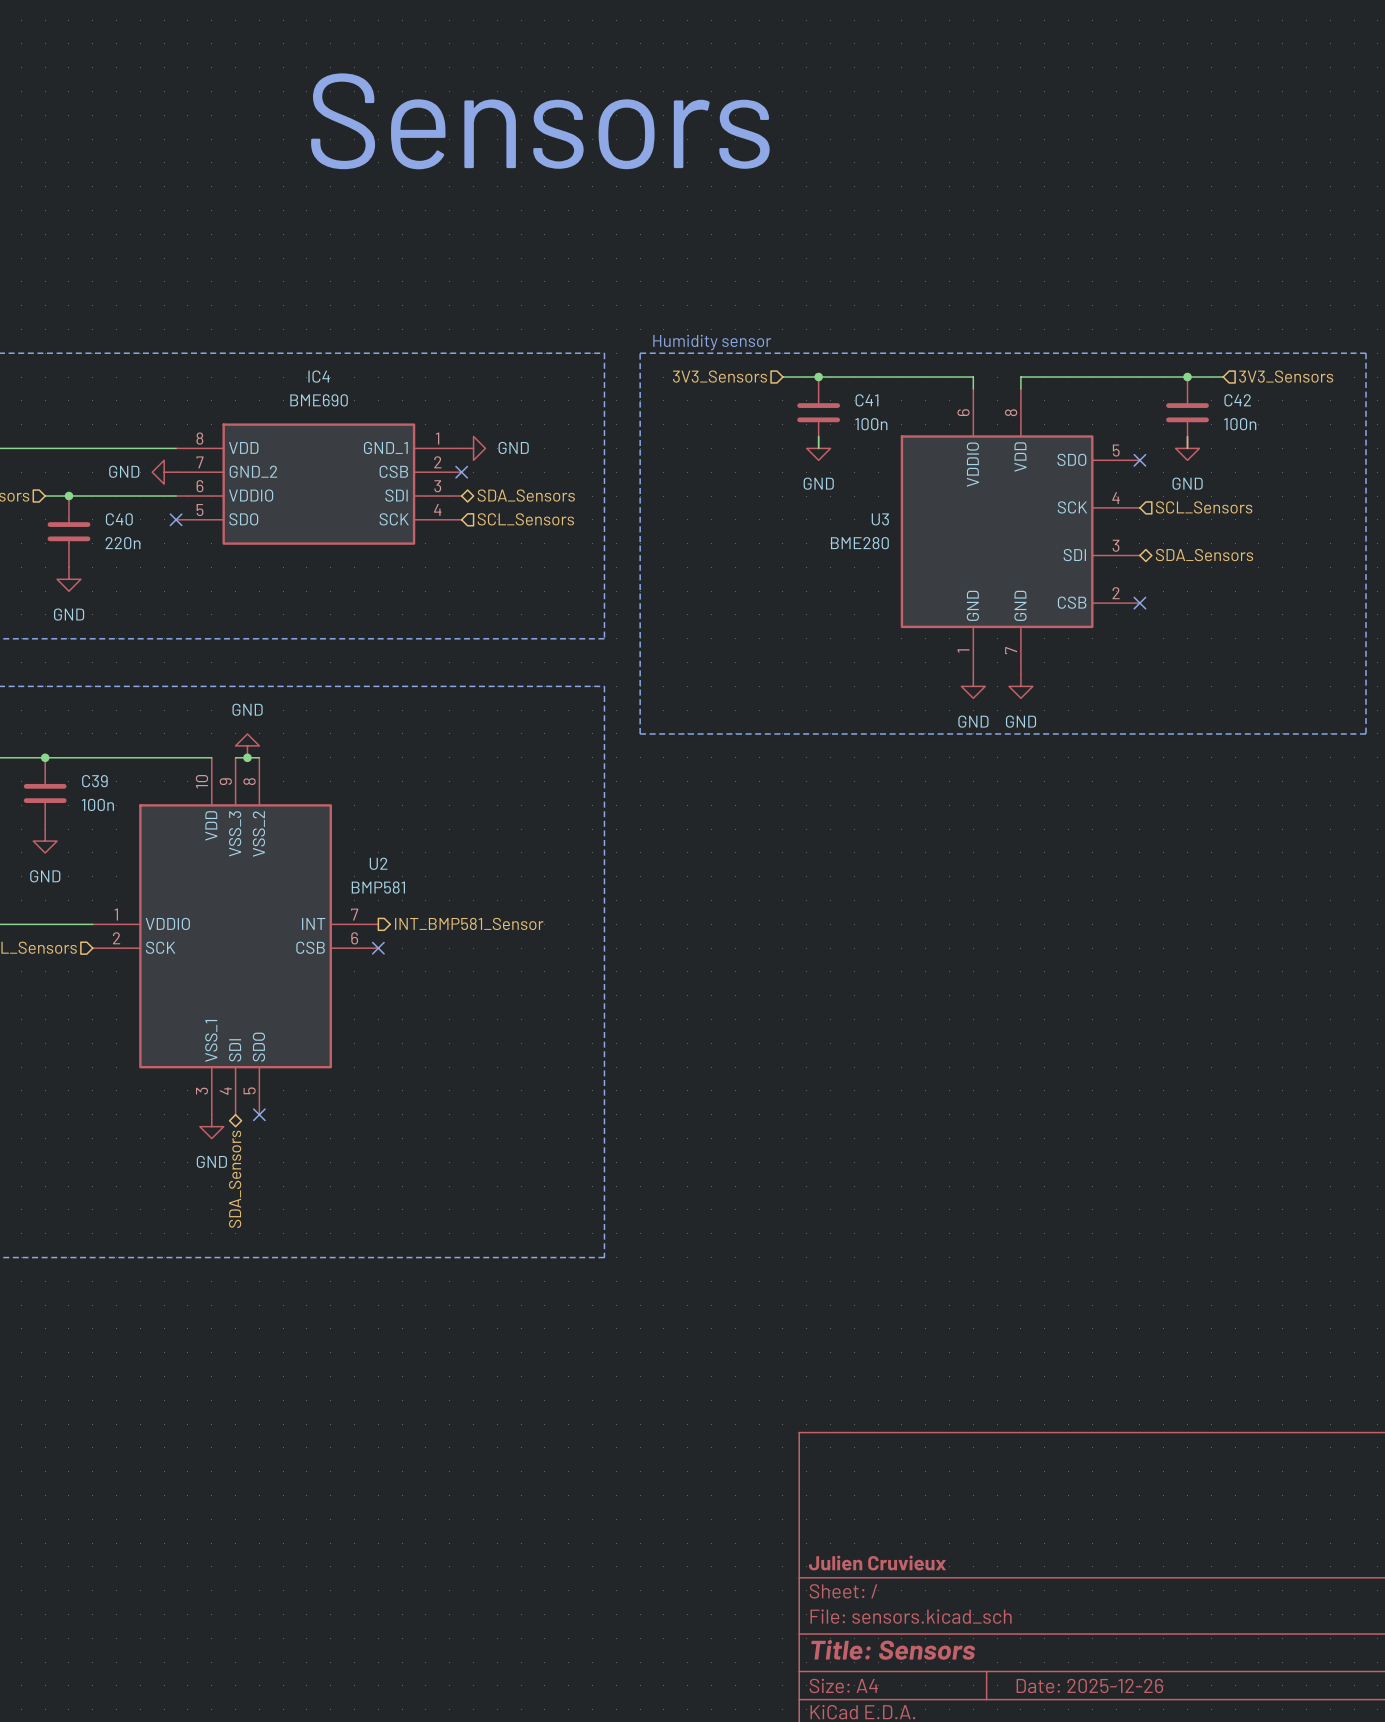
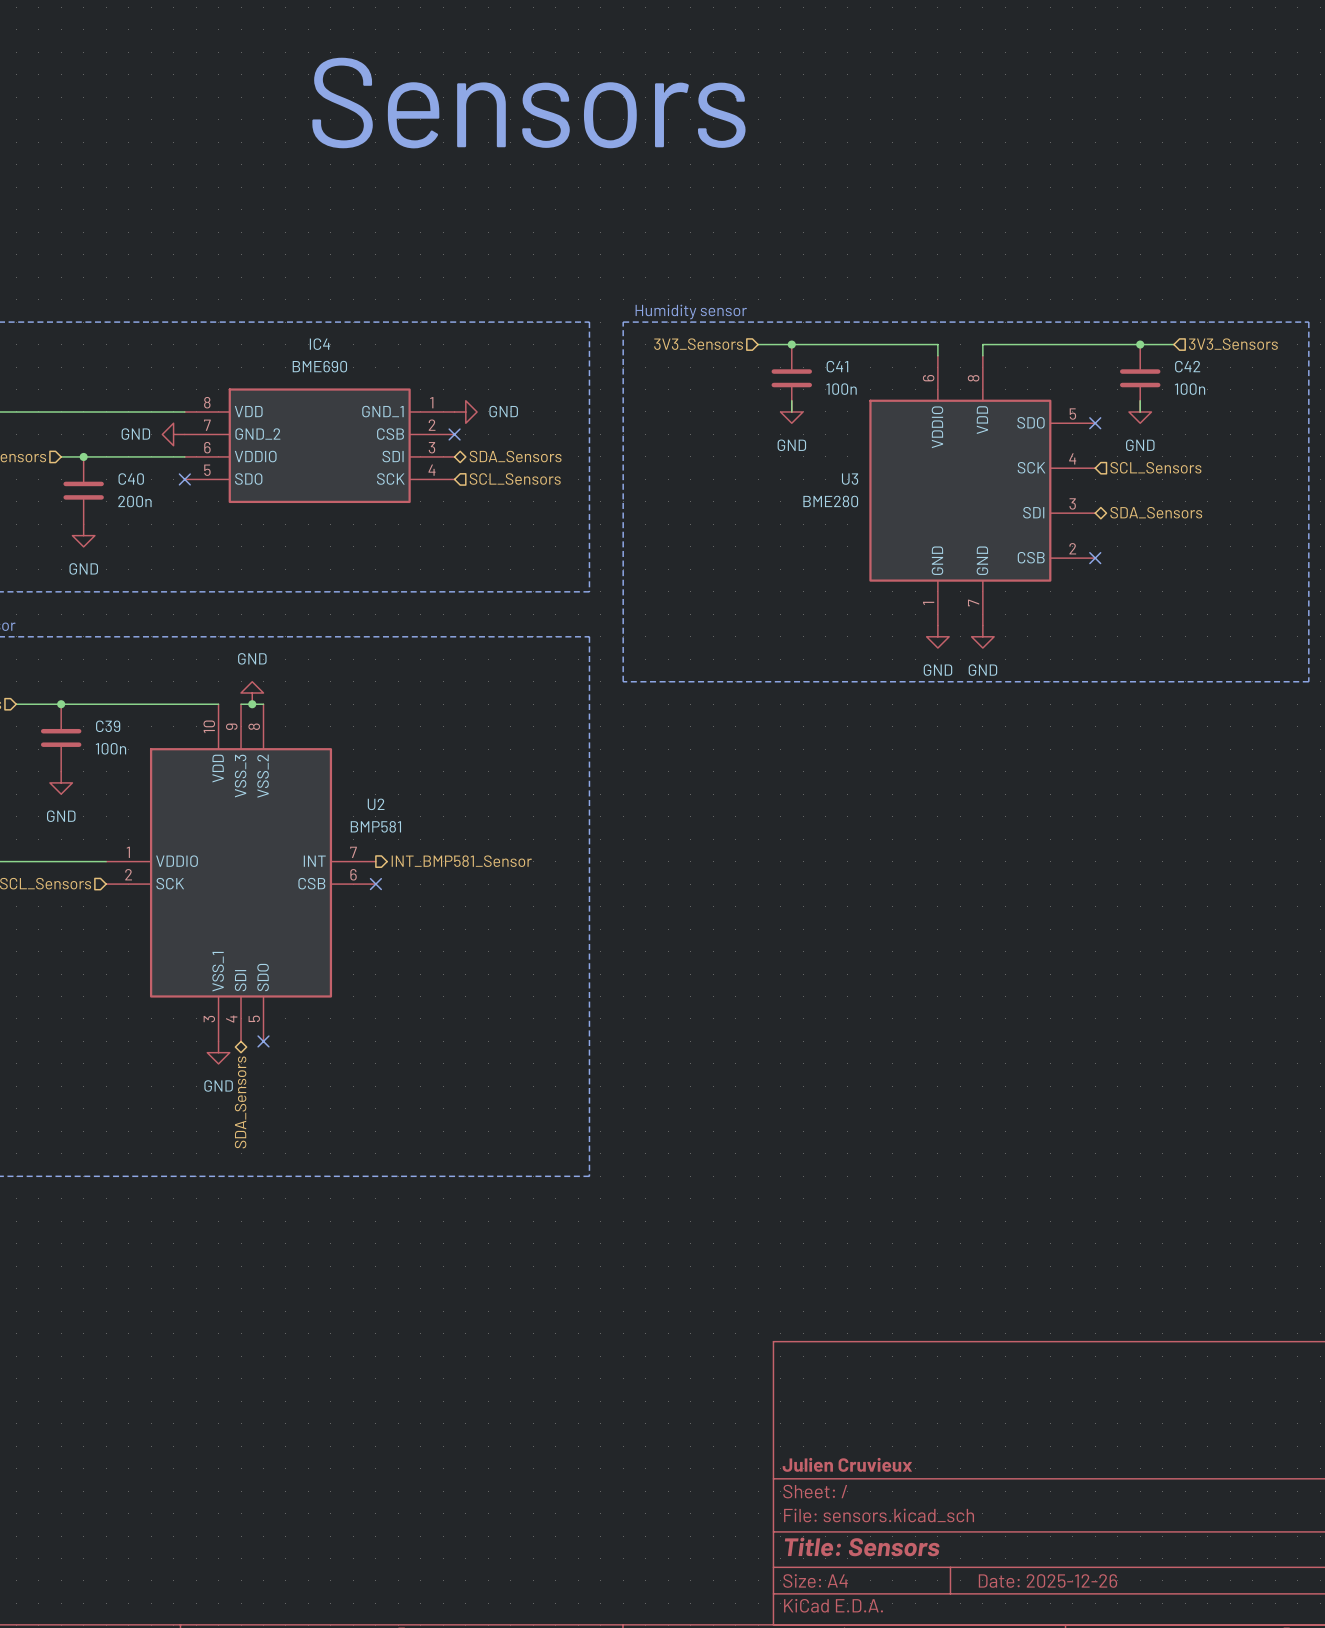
C40 value: 220n (123, 543) -> 200n (134, 501)

